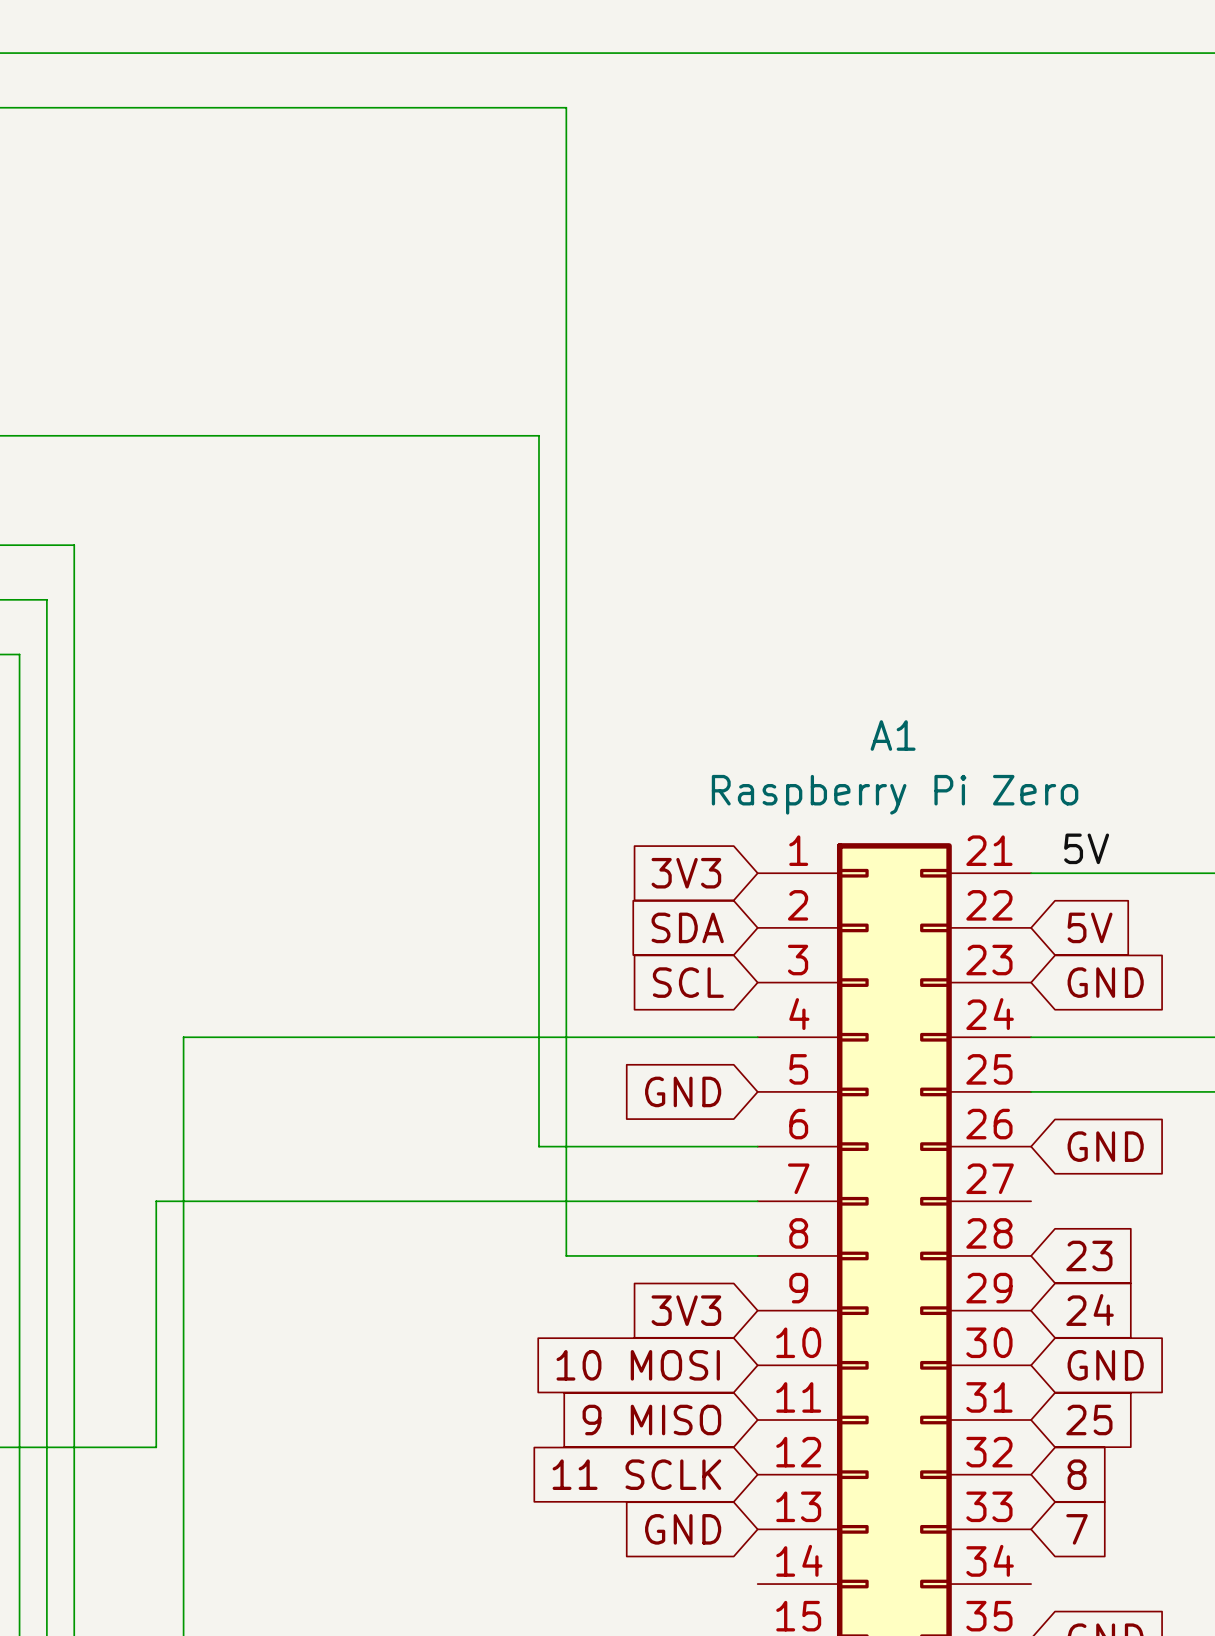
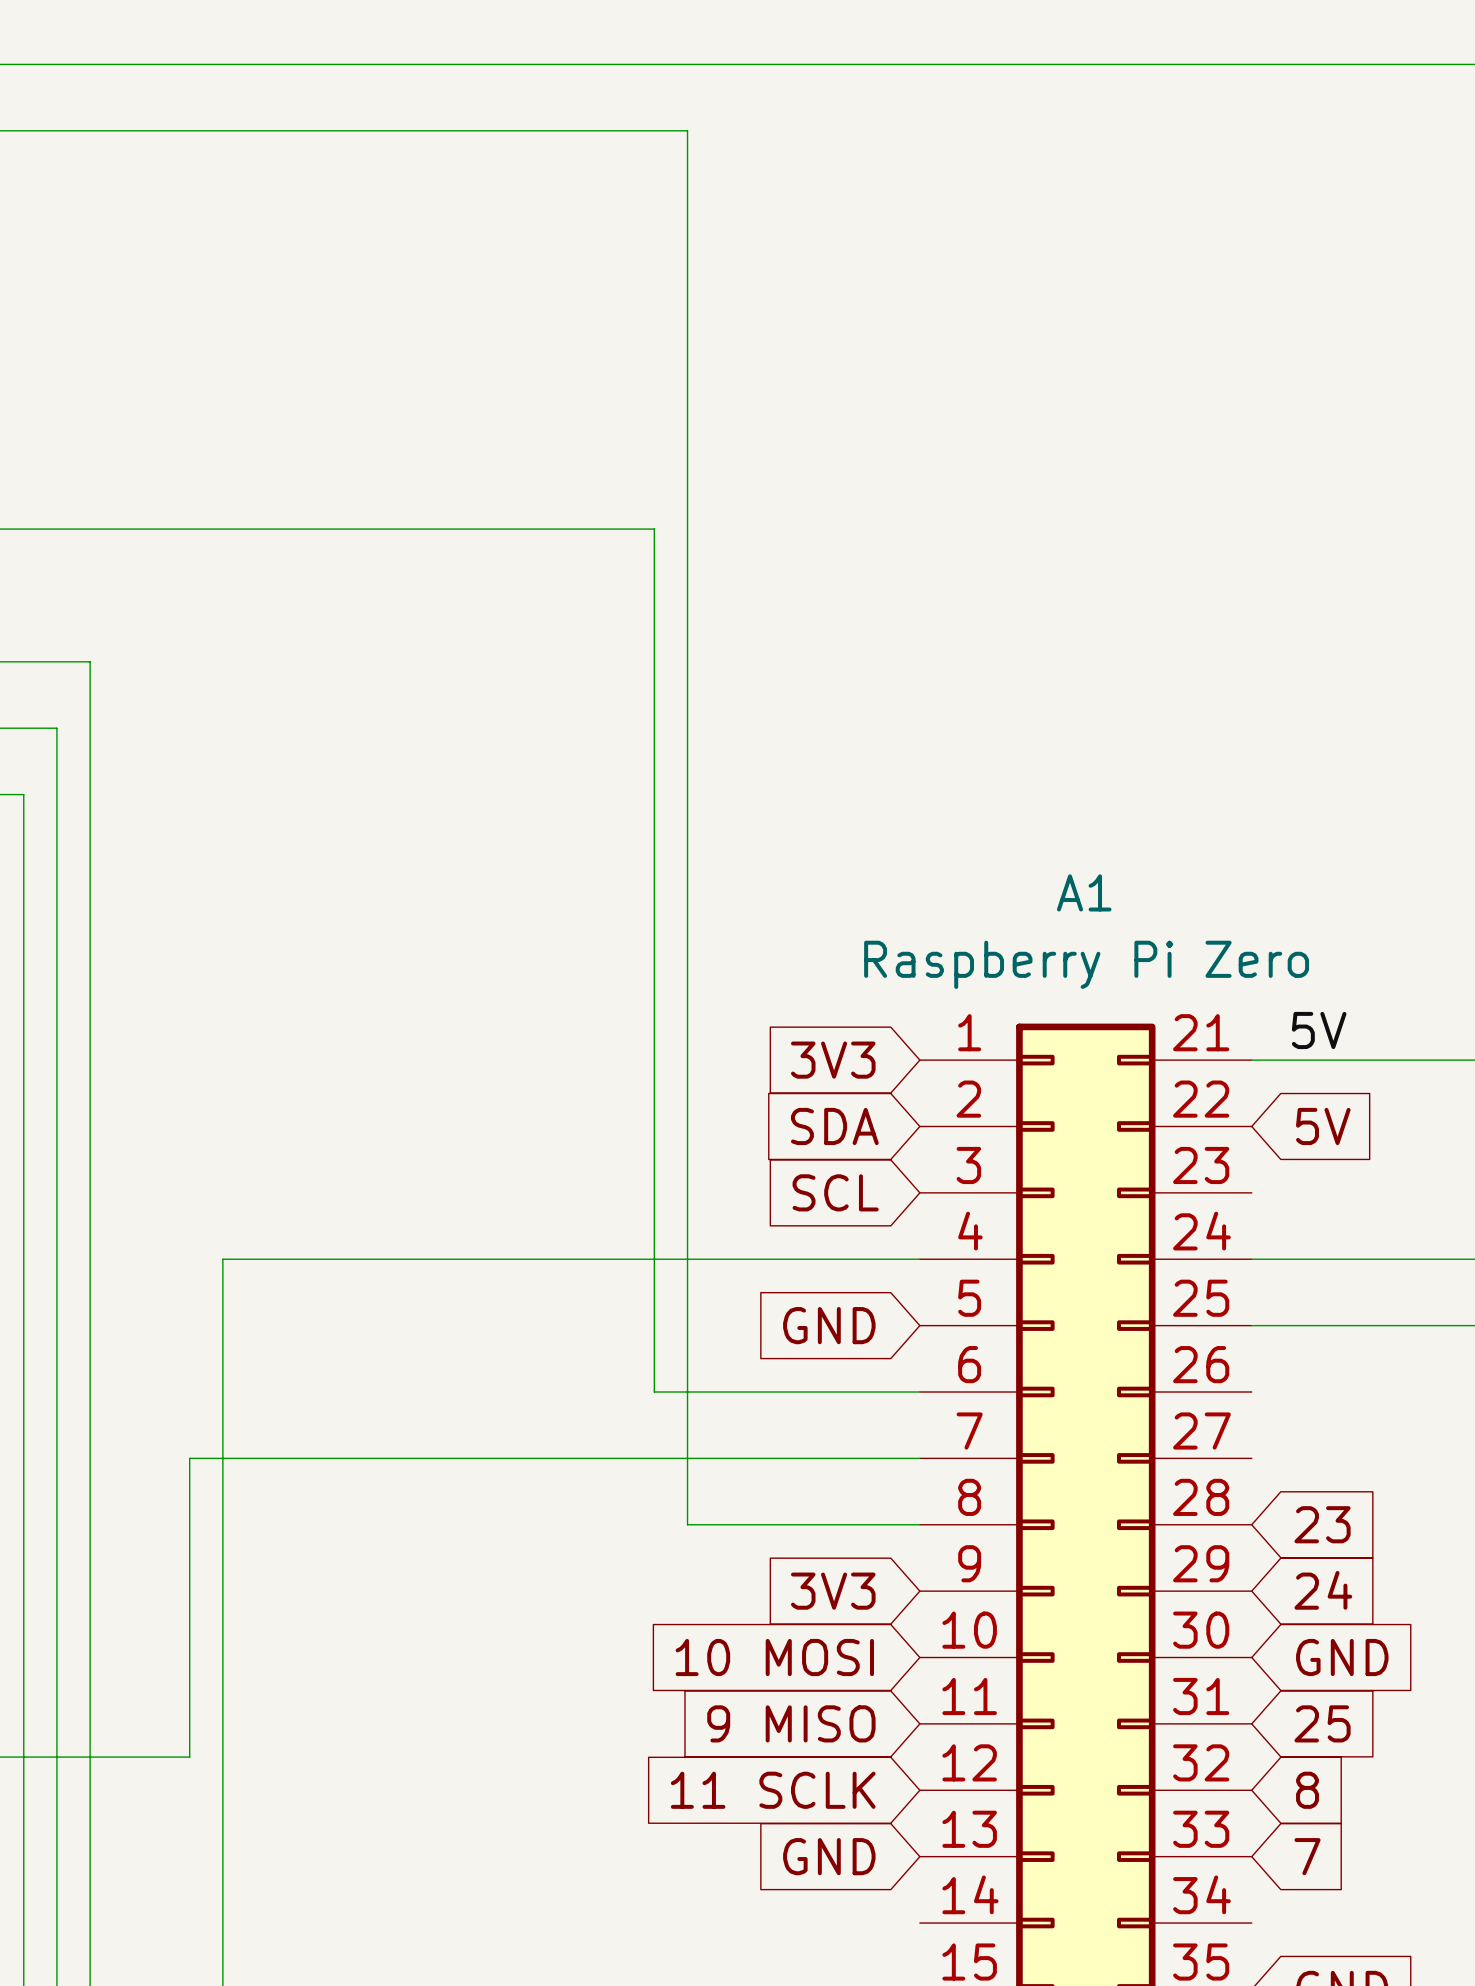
global label: GND (1105, 982) -> none
global label: GND (1105, 1146) -> none

